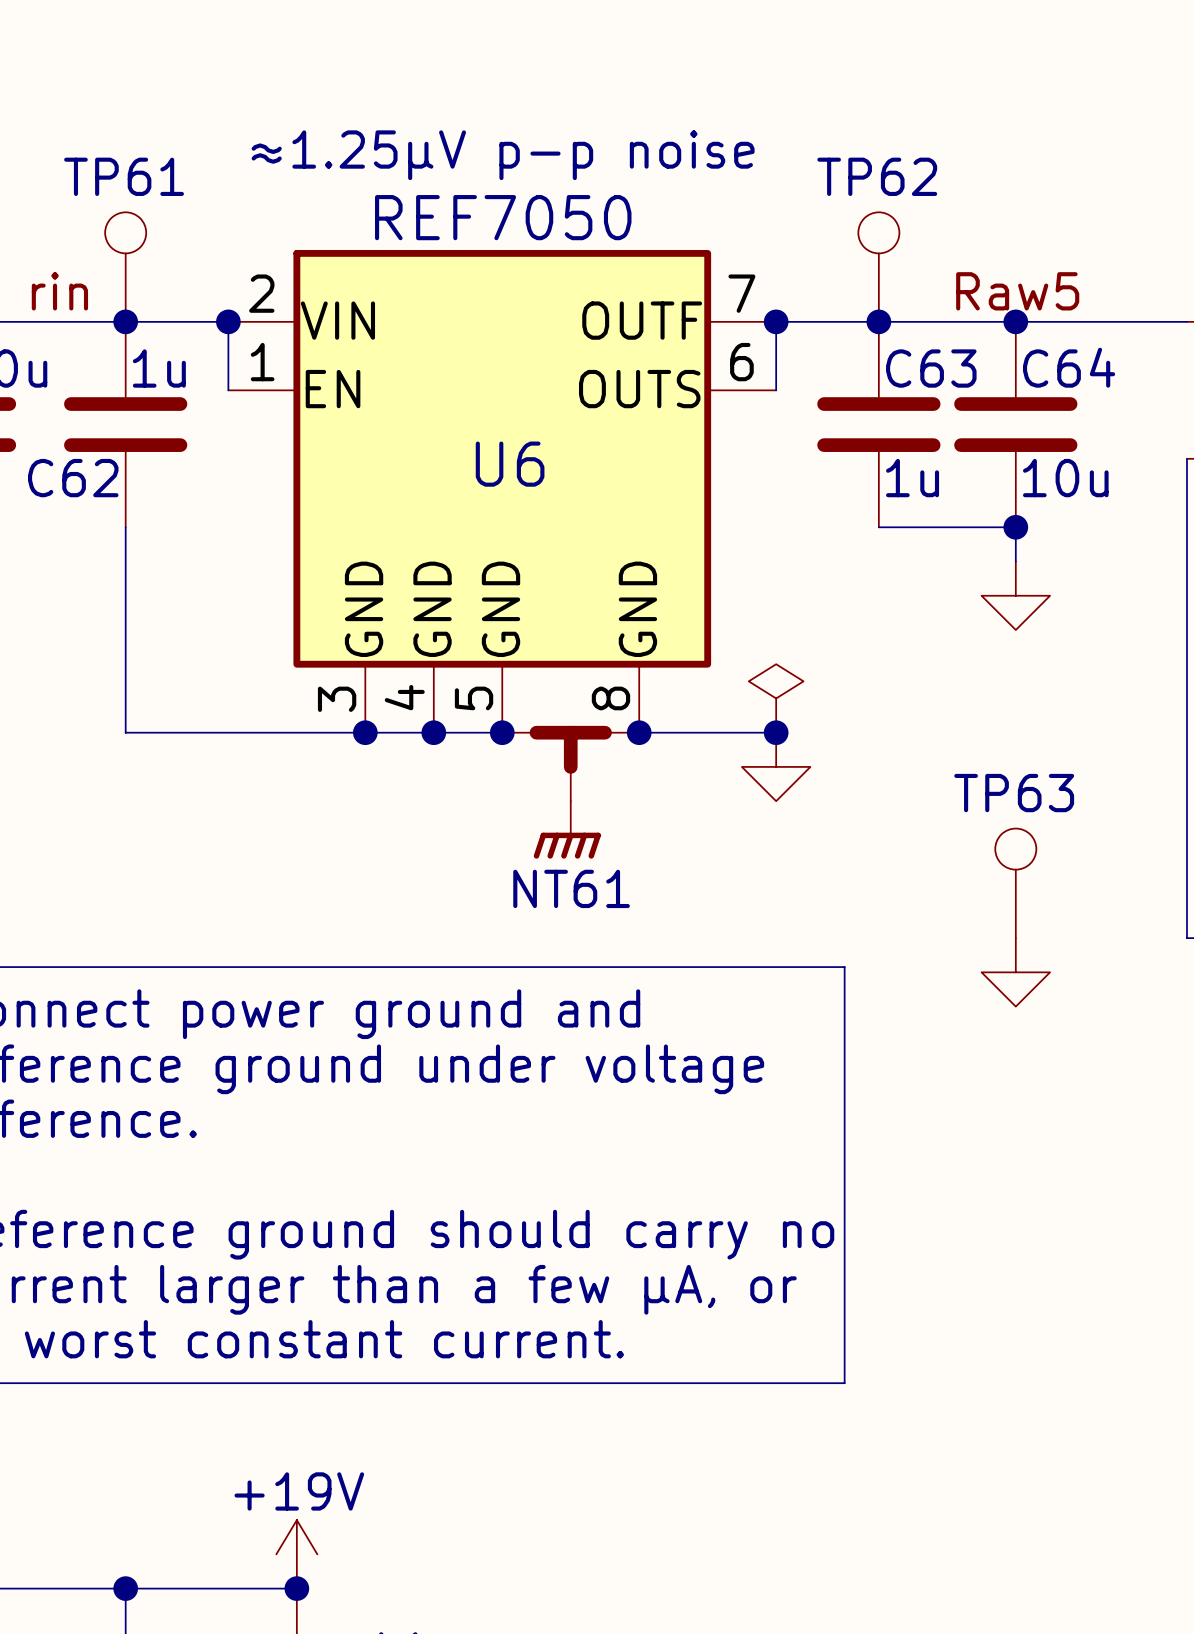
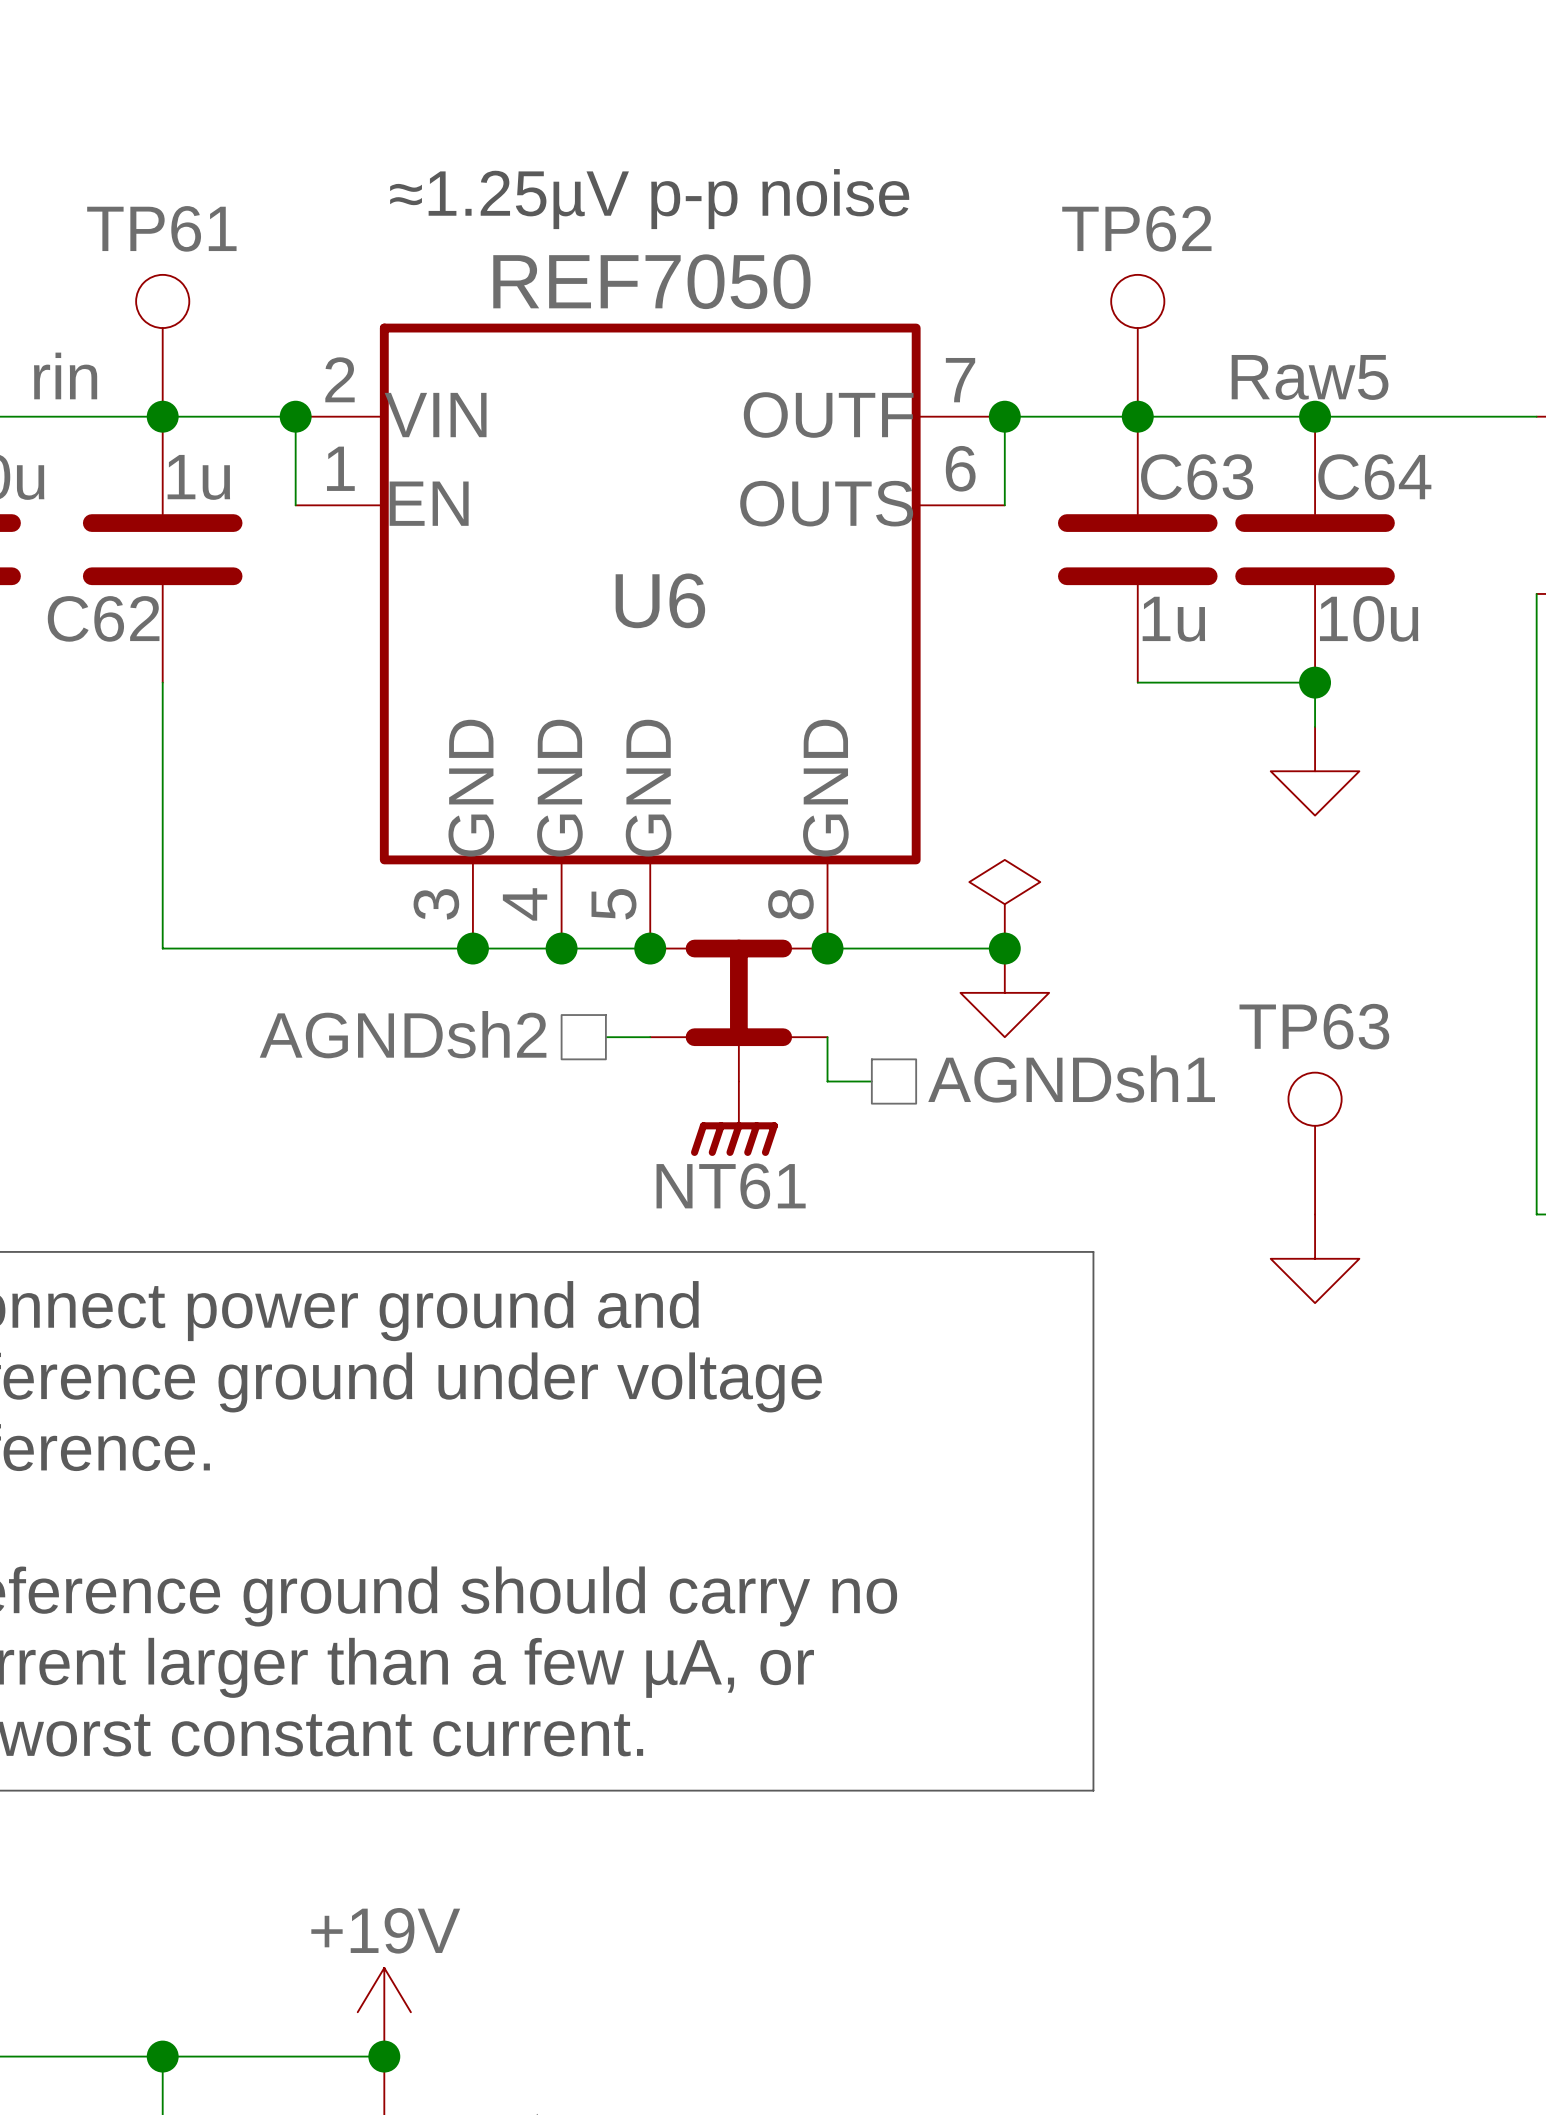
NT61 symbol: [502, 725, 640, 805] -> [650, 939, 828, 1082]
hierarchical label: none -> AGNDsh2 (403, 1034)
wire: none -> (605, 1037) (650, 1037)
wire: none -> (827, 1037) (827, 1081) (871, 1081)
power symbol position: (567, 829) -> (734, 1118)
hierarchical label: none -> AGNDsh1 (1071, 1078)

